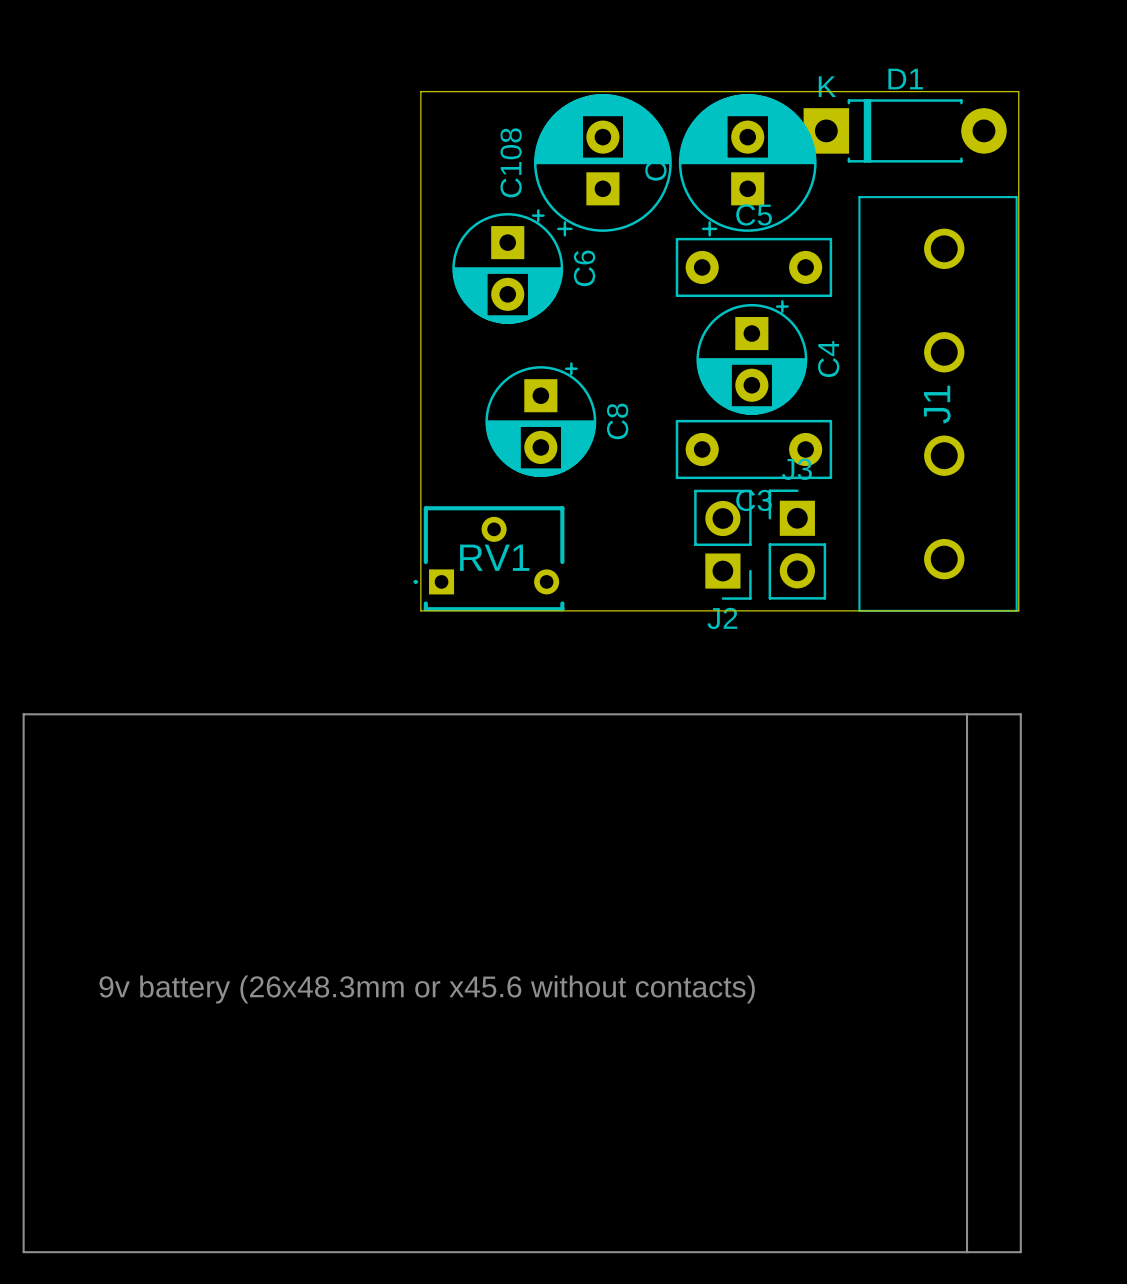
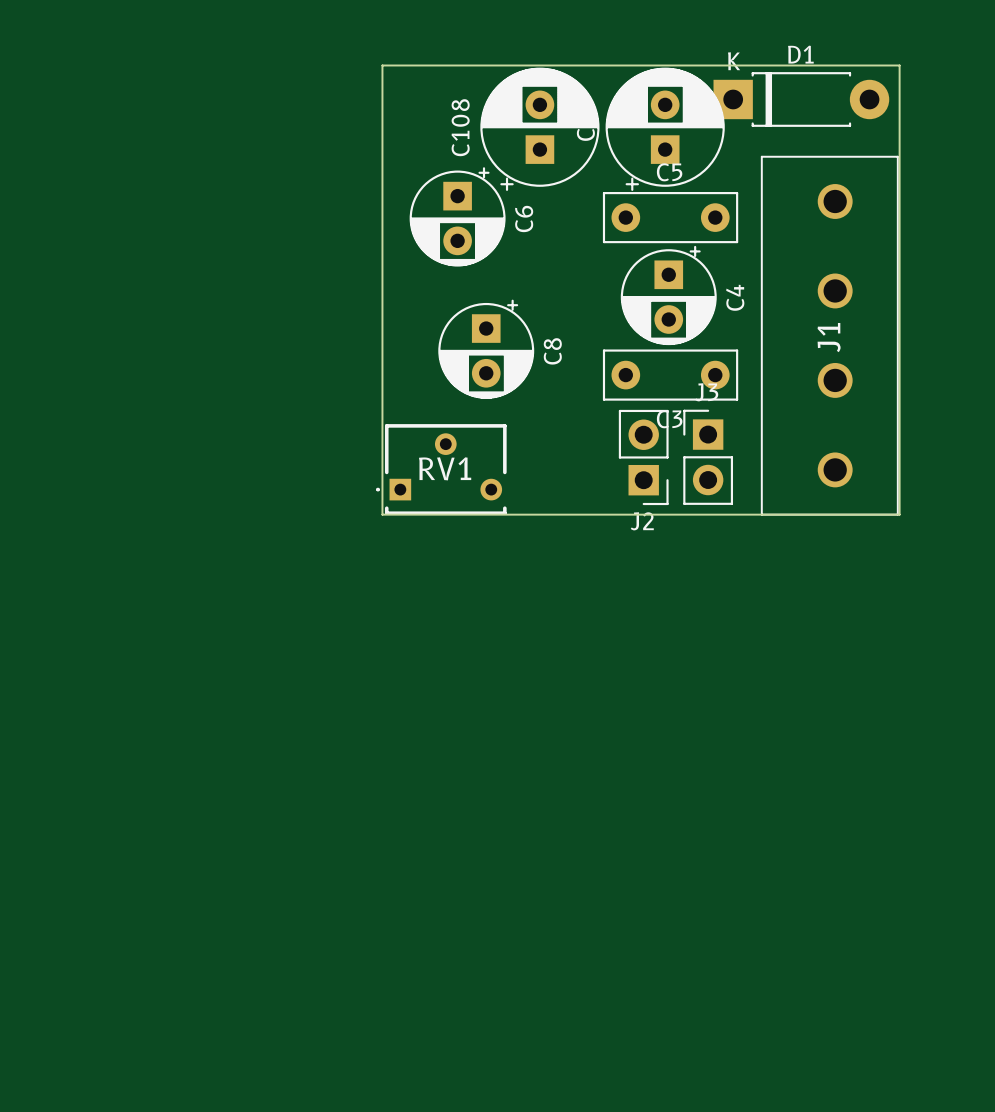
line: (23, 714) (1020, 714) (1020, 1252) (23, 1252) (23, 714) -> none
line: (967, 714) (967, 1252) -> none
text: 9v battery (26x48.3mm or x45.6 without contacts) (427, 989) -> none

